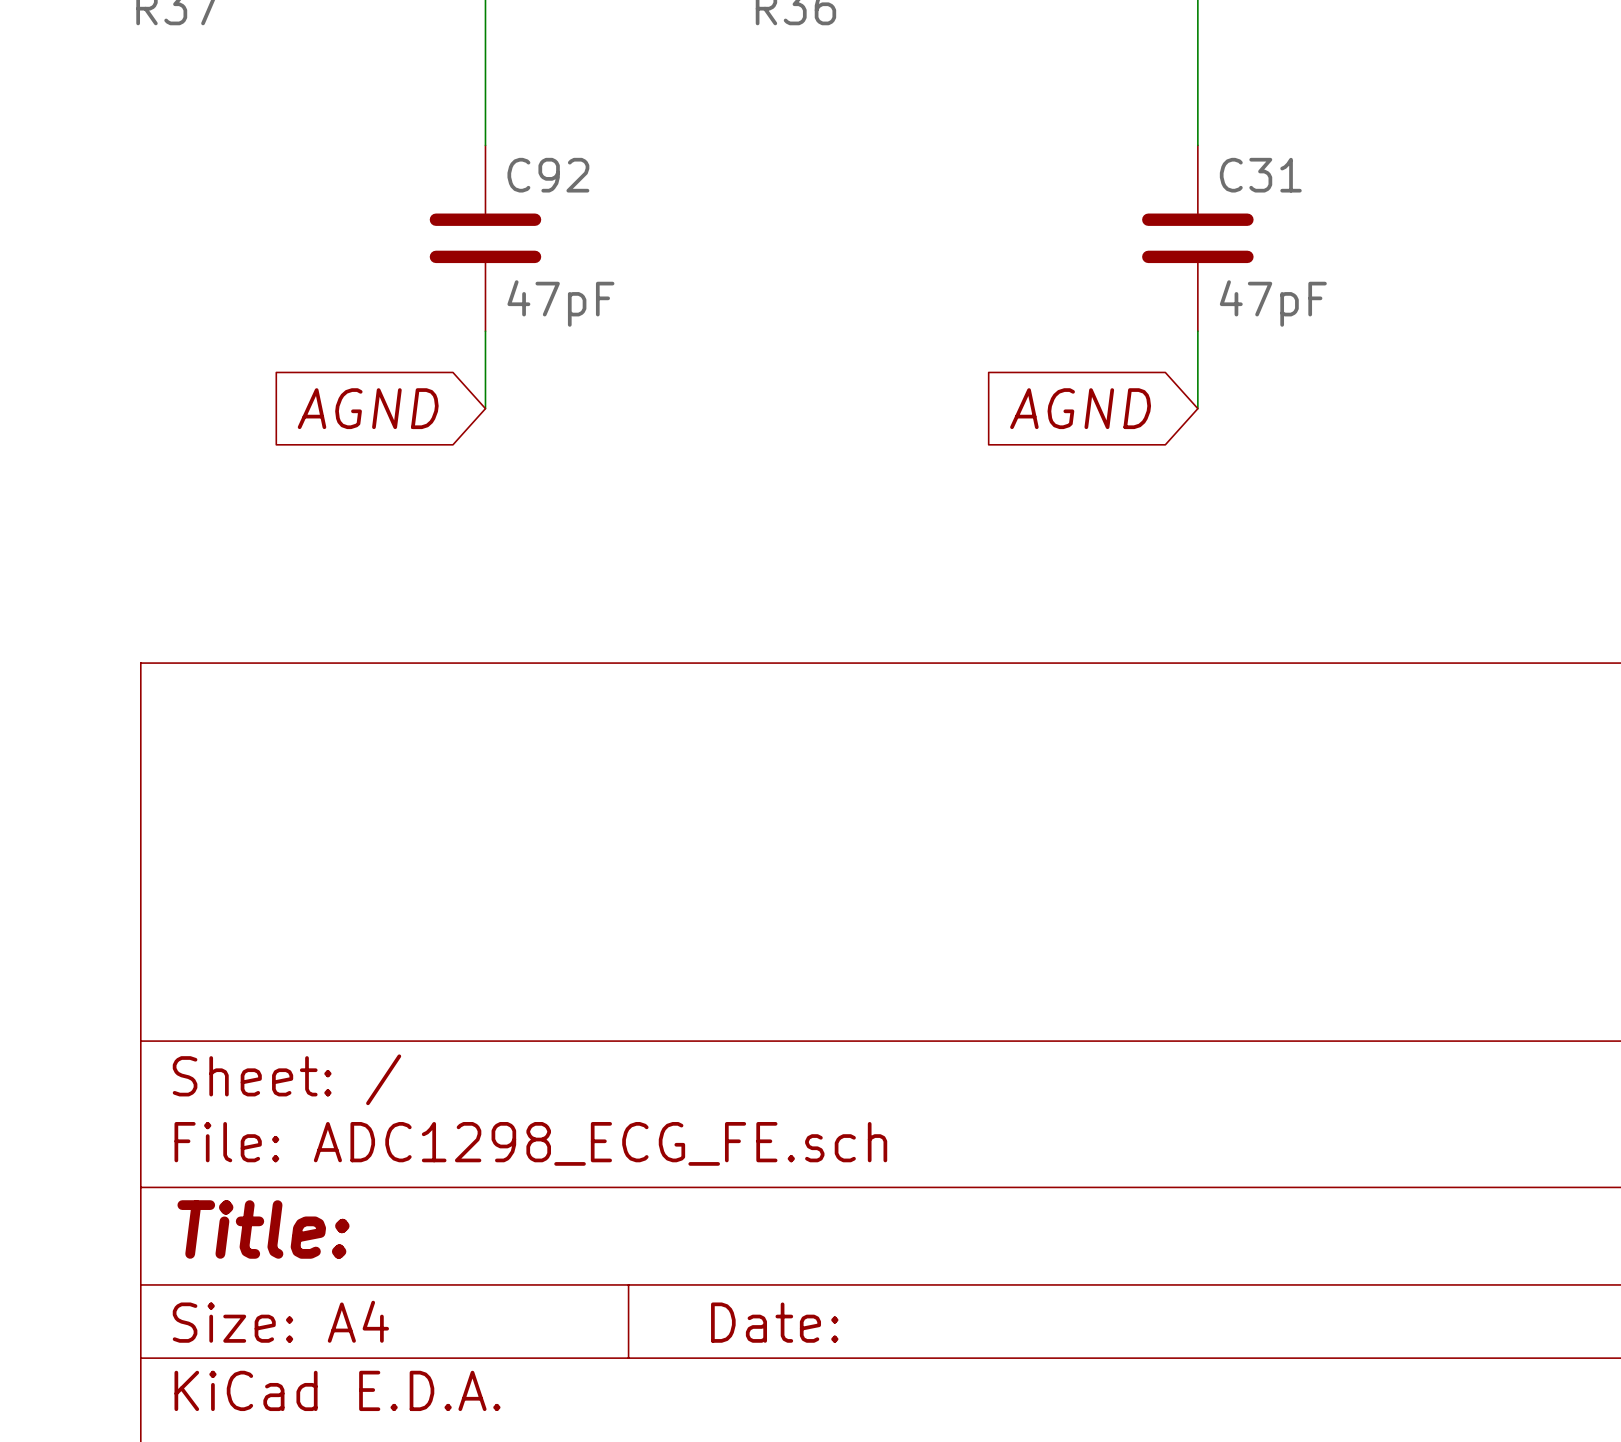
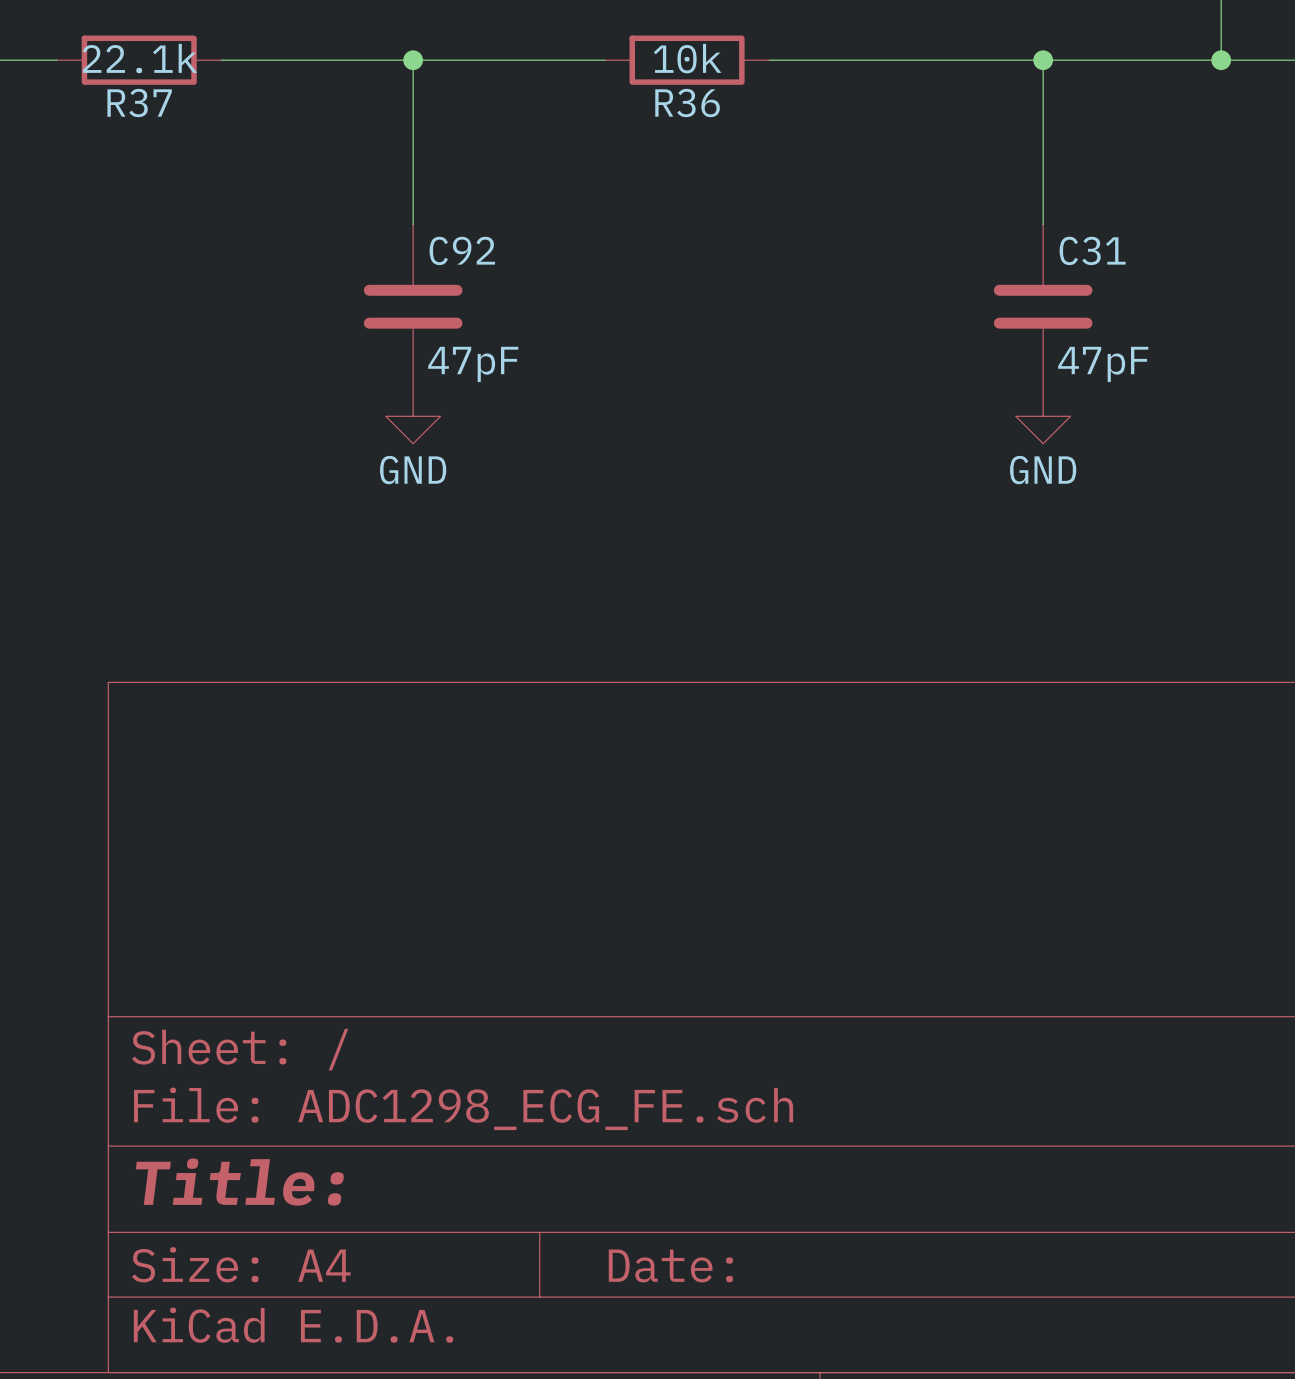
wire: (485, 331) (485, 408) -> none
wire: (1197, 331) (1197, 408) -> none
power symbol: none -> GND (413, 416)
power symbol: none -> GND (1043, 416)
global label: AGND (368, 408) -> none
global label: AGND (1080, 408) -> none

